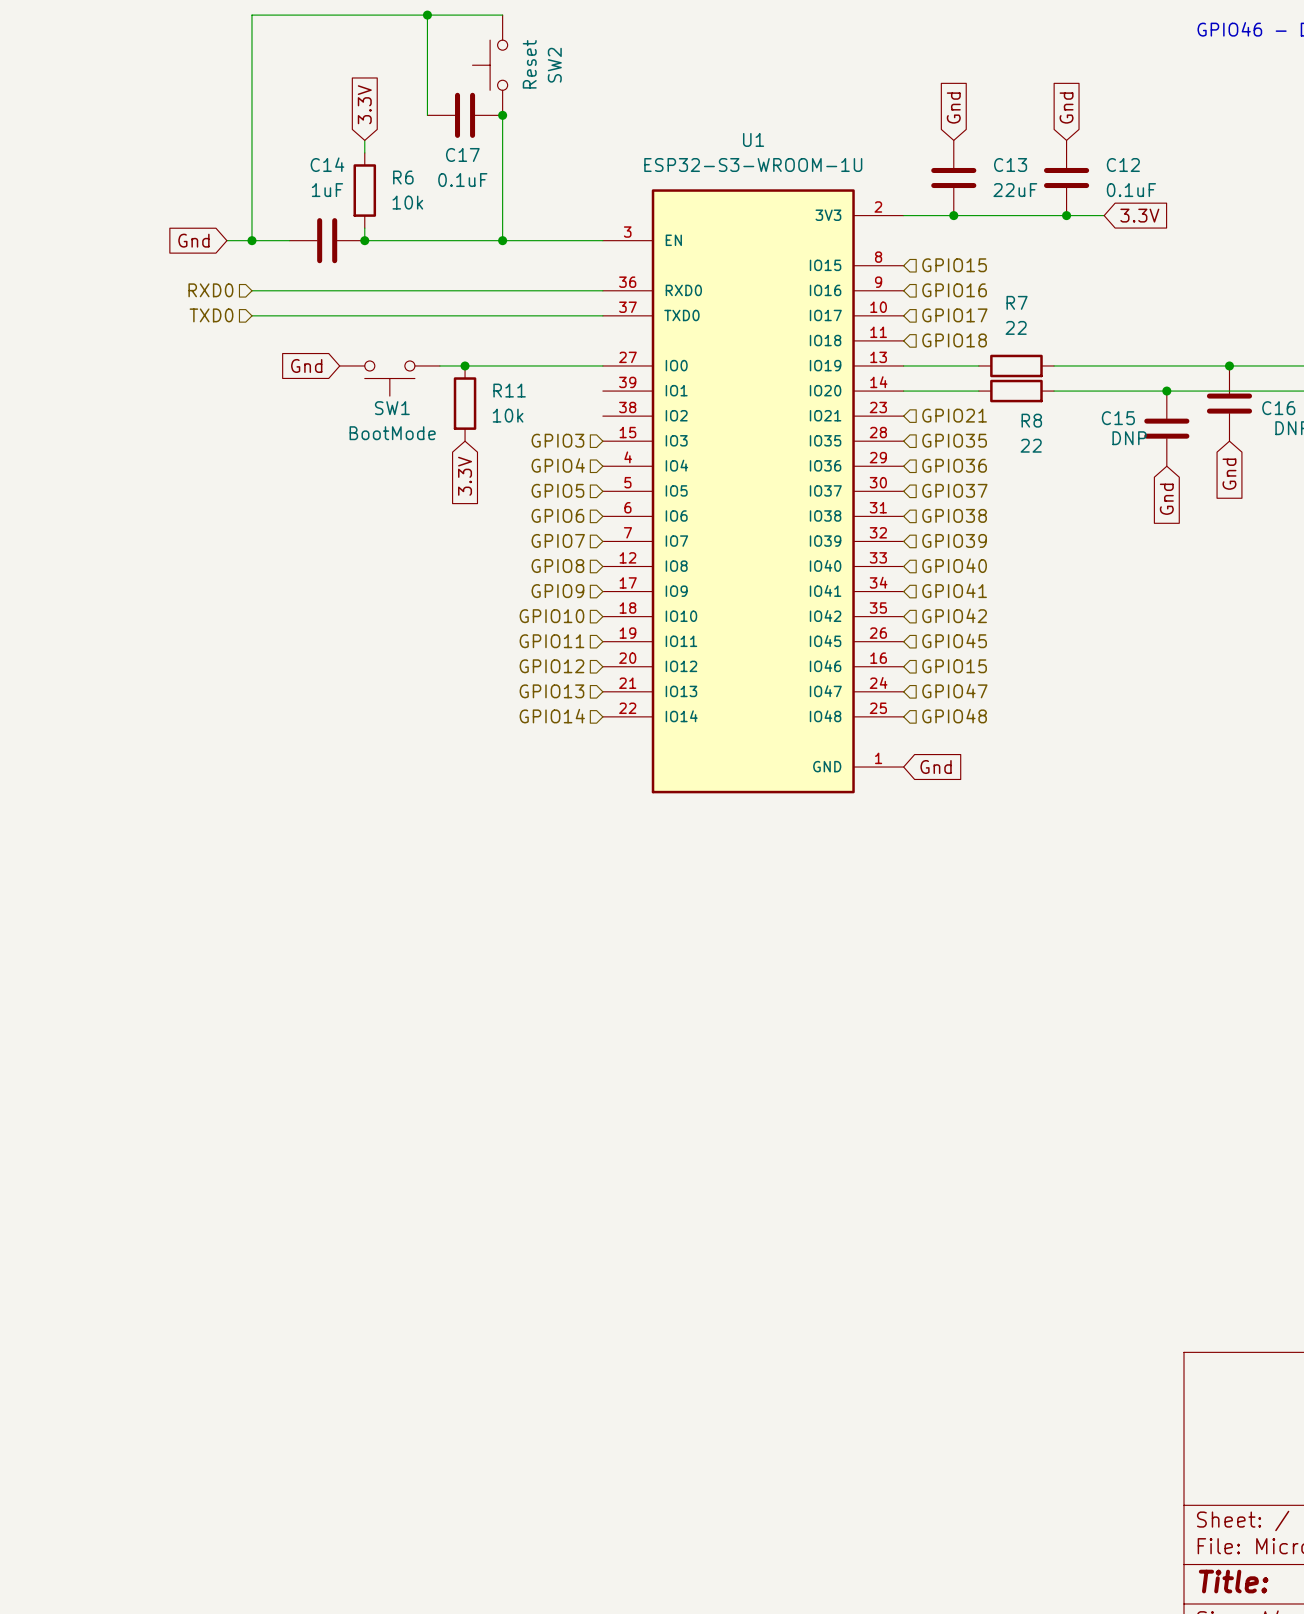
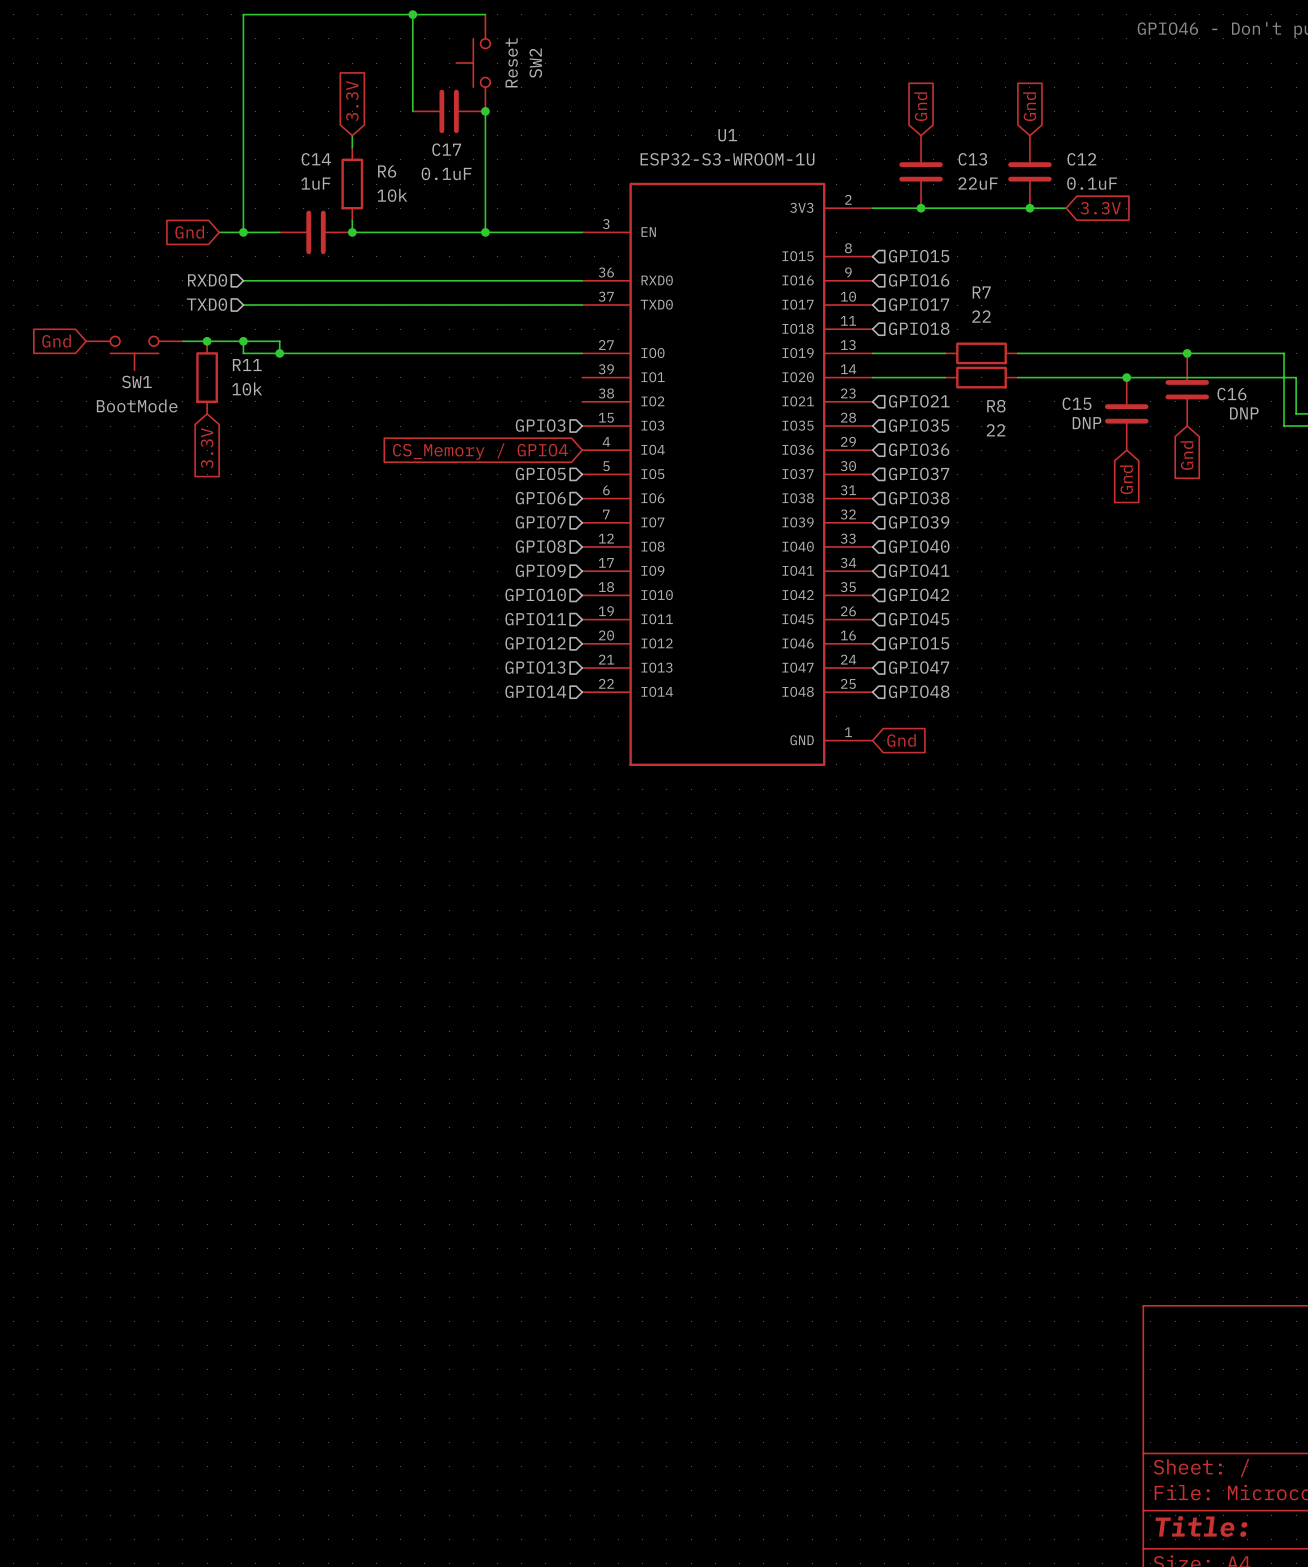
global label: none -> Gnd (56, 341)
wire: none -> (182, 341) (279, 341) (279, 353)
junction: none -> (207, 341)
wire: none -> (243, 341) (243, 353) (424, 353)
junction: none -> (243, 341)
junction: none -> (279, 353)
global label: Gnd (306, 365) -> none
junction: (465, 365) -> none
SW1 position: (389, 378) -> (134, 353)
R11 position: (465, 403) -> (207, 377)
global label: none -> 3.3V (207, 448)
hierarchical label: GPIO4 (558, 465) -> none
global label: none -> CS_Memory / GPIO4 (480, 451)
global label: 3.3V (465, 476) -> none

